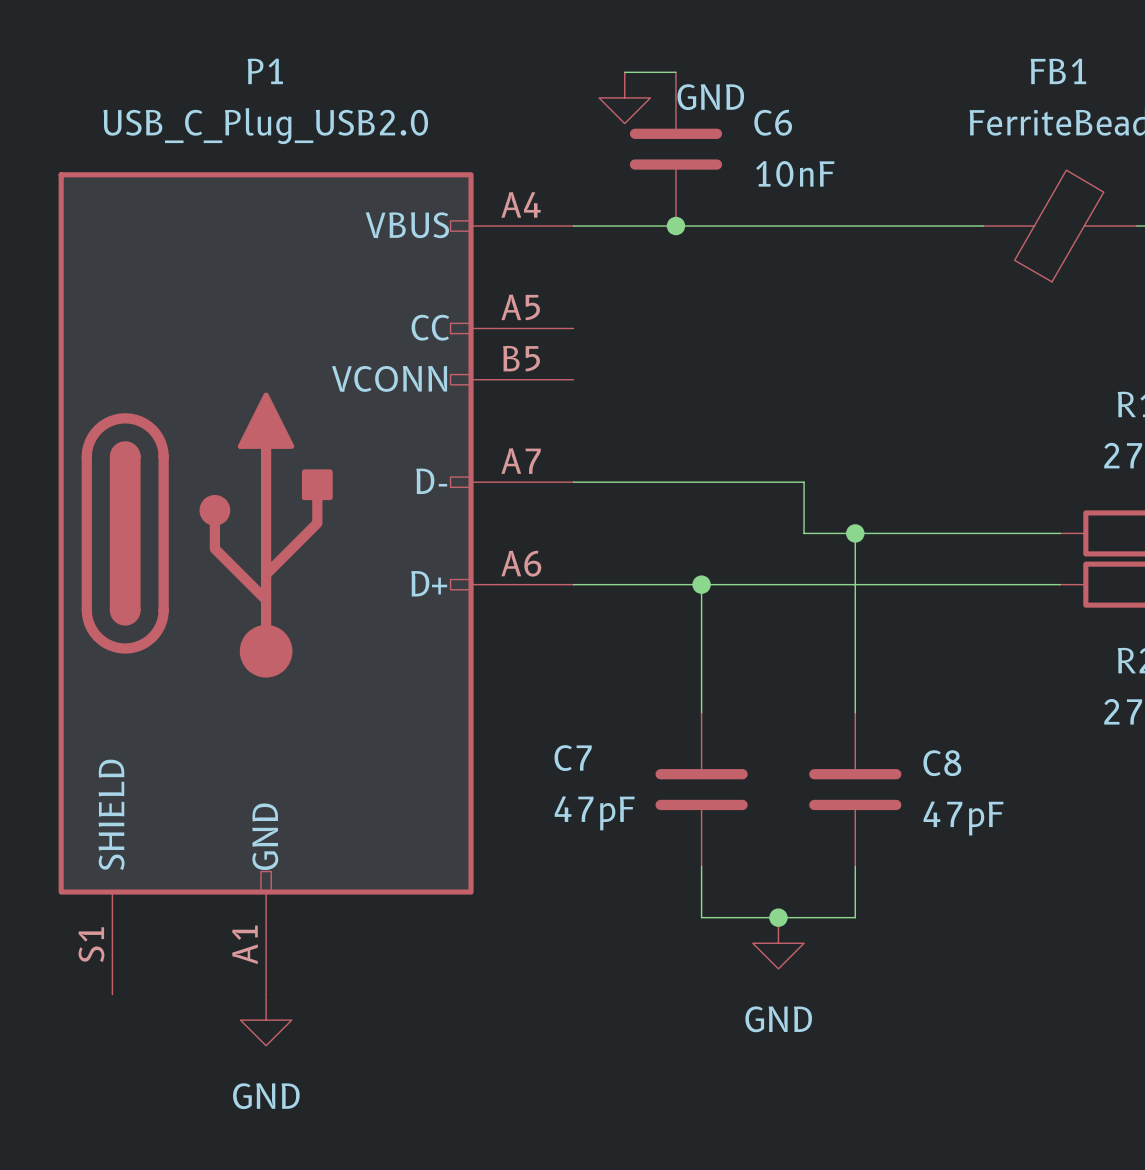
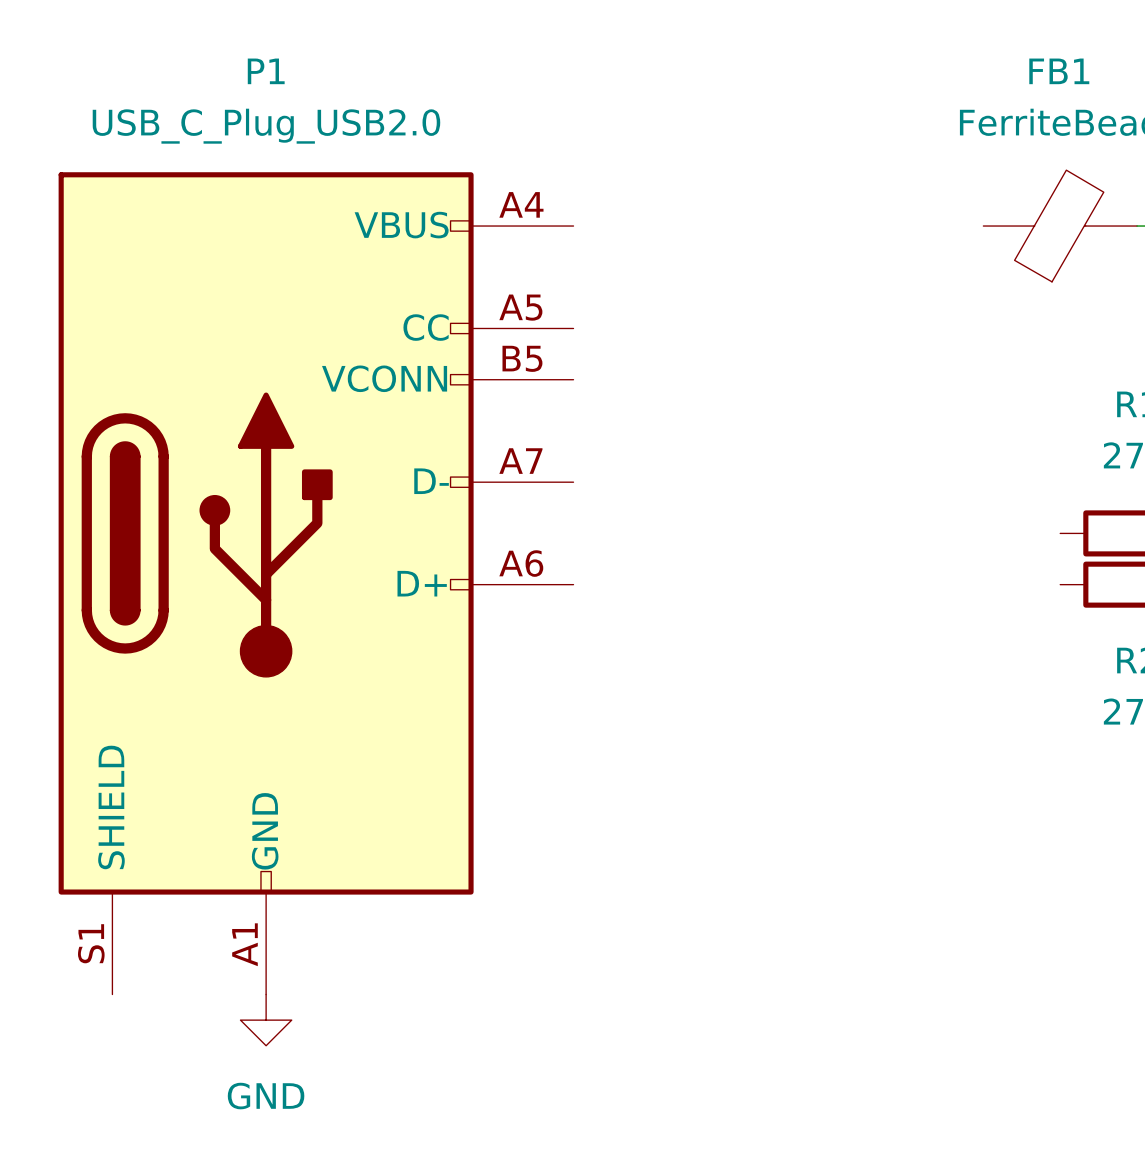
wire: (624, 72) (675, 72) -> none
power symbol: GND (624, 97) -> none
C6: 10nF (675, 149) -> none
wire: (573, 226) (983, 226) -> none
junction: (675, 226) -> none
wire: (573, 482) (804, 482) (804, 533) (1060, 533) -> none
wire: (855, 533) (855, 712) -> none
junction: (855, 533) -> none
wire: (573, 584) (1060, 584) -> none
wire: (701, 584) (701, 712) -> none
junction: (701, 584) -> none
C7: 47pF (701, 789) -> none
C8: 47pF (855, 789) -> none
wire: (701, 866) (701, 917) (855, 917) (855, 866) -> none
junction: (778, 917) -> none
power symbol: GND (778, 943) -> none

